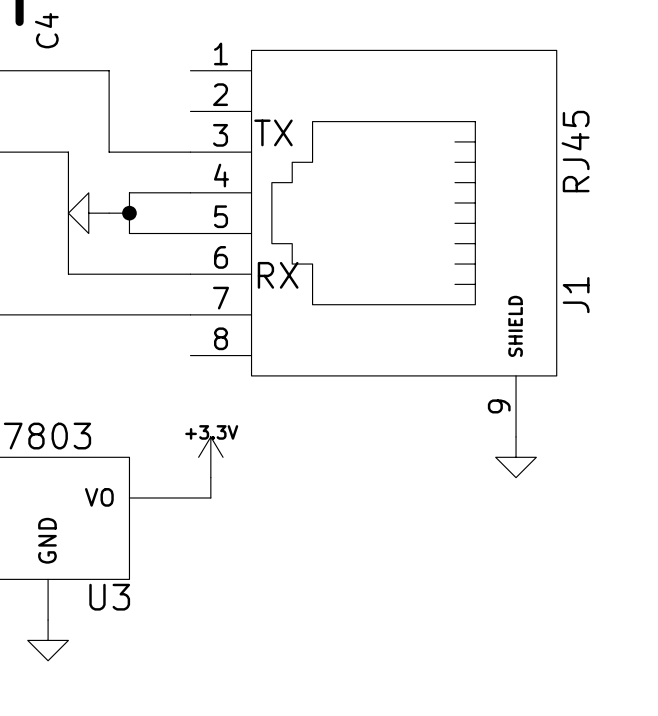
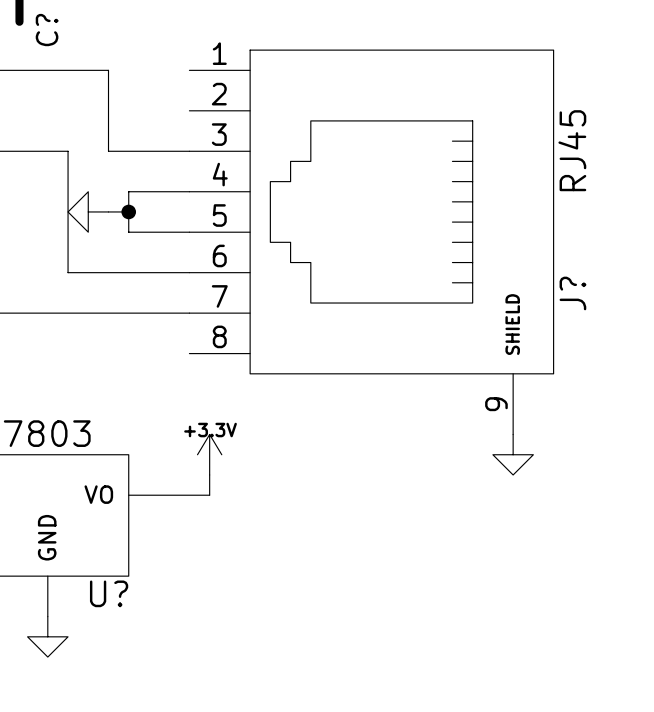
C4 name: C4 (46, 30) -> C? (47, 30)
text: TX (273, 132) -> none
text: RX (278, 275) -> none
J1 name: J1 (576, 295) -> J? (572, 293)
U3 name: U3 (109, 597) -> U? (109, 593)

